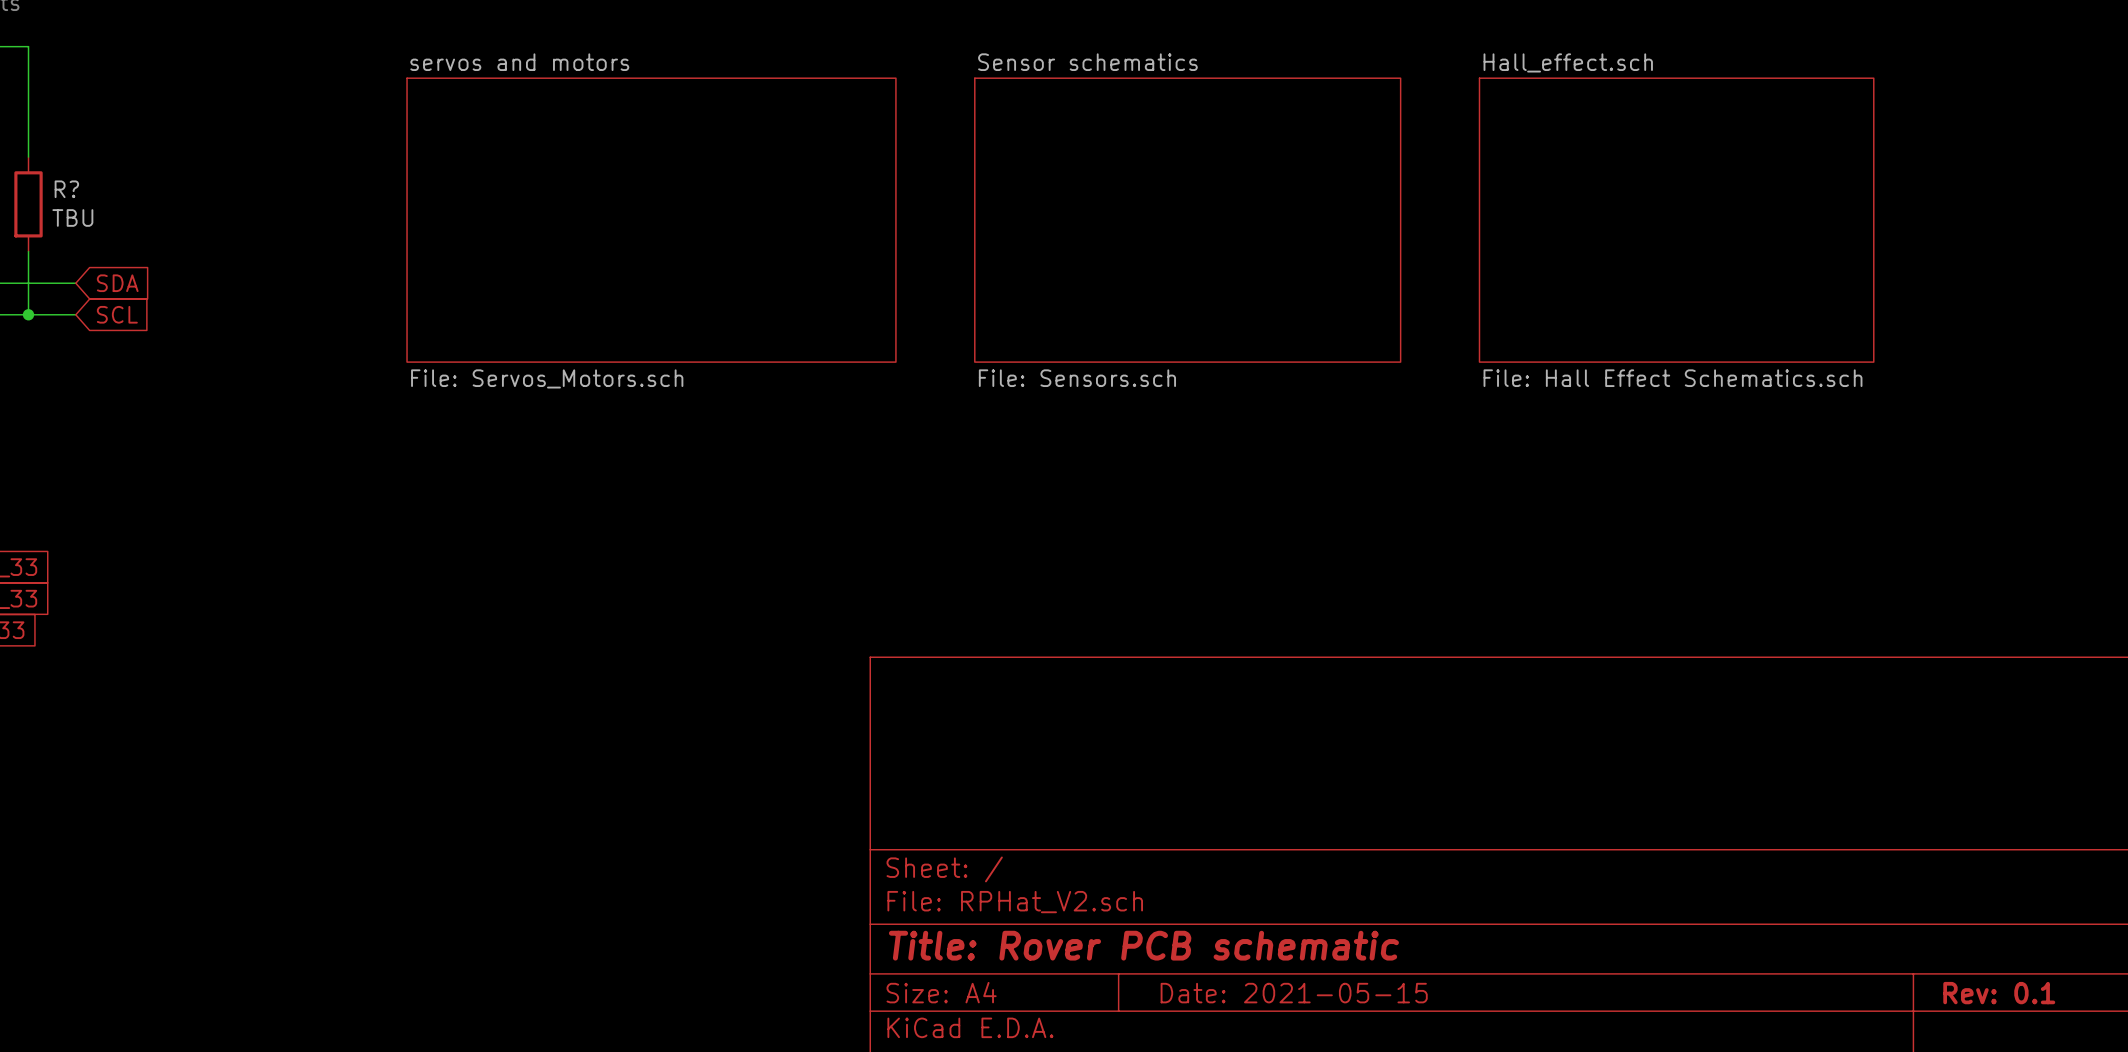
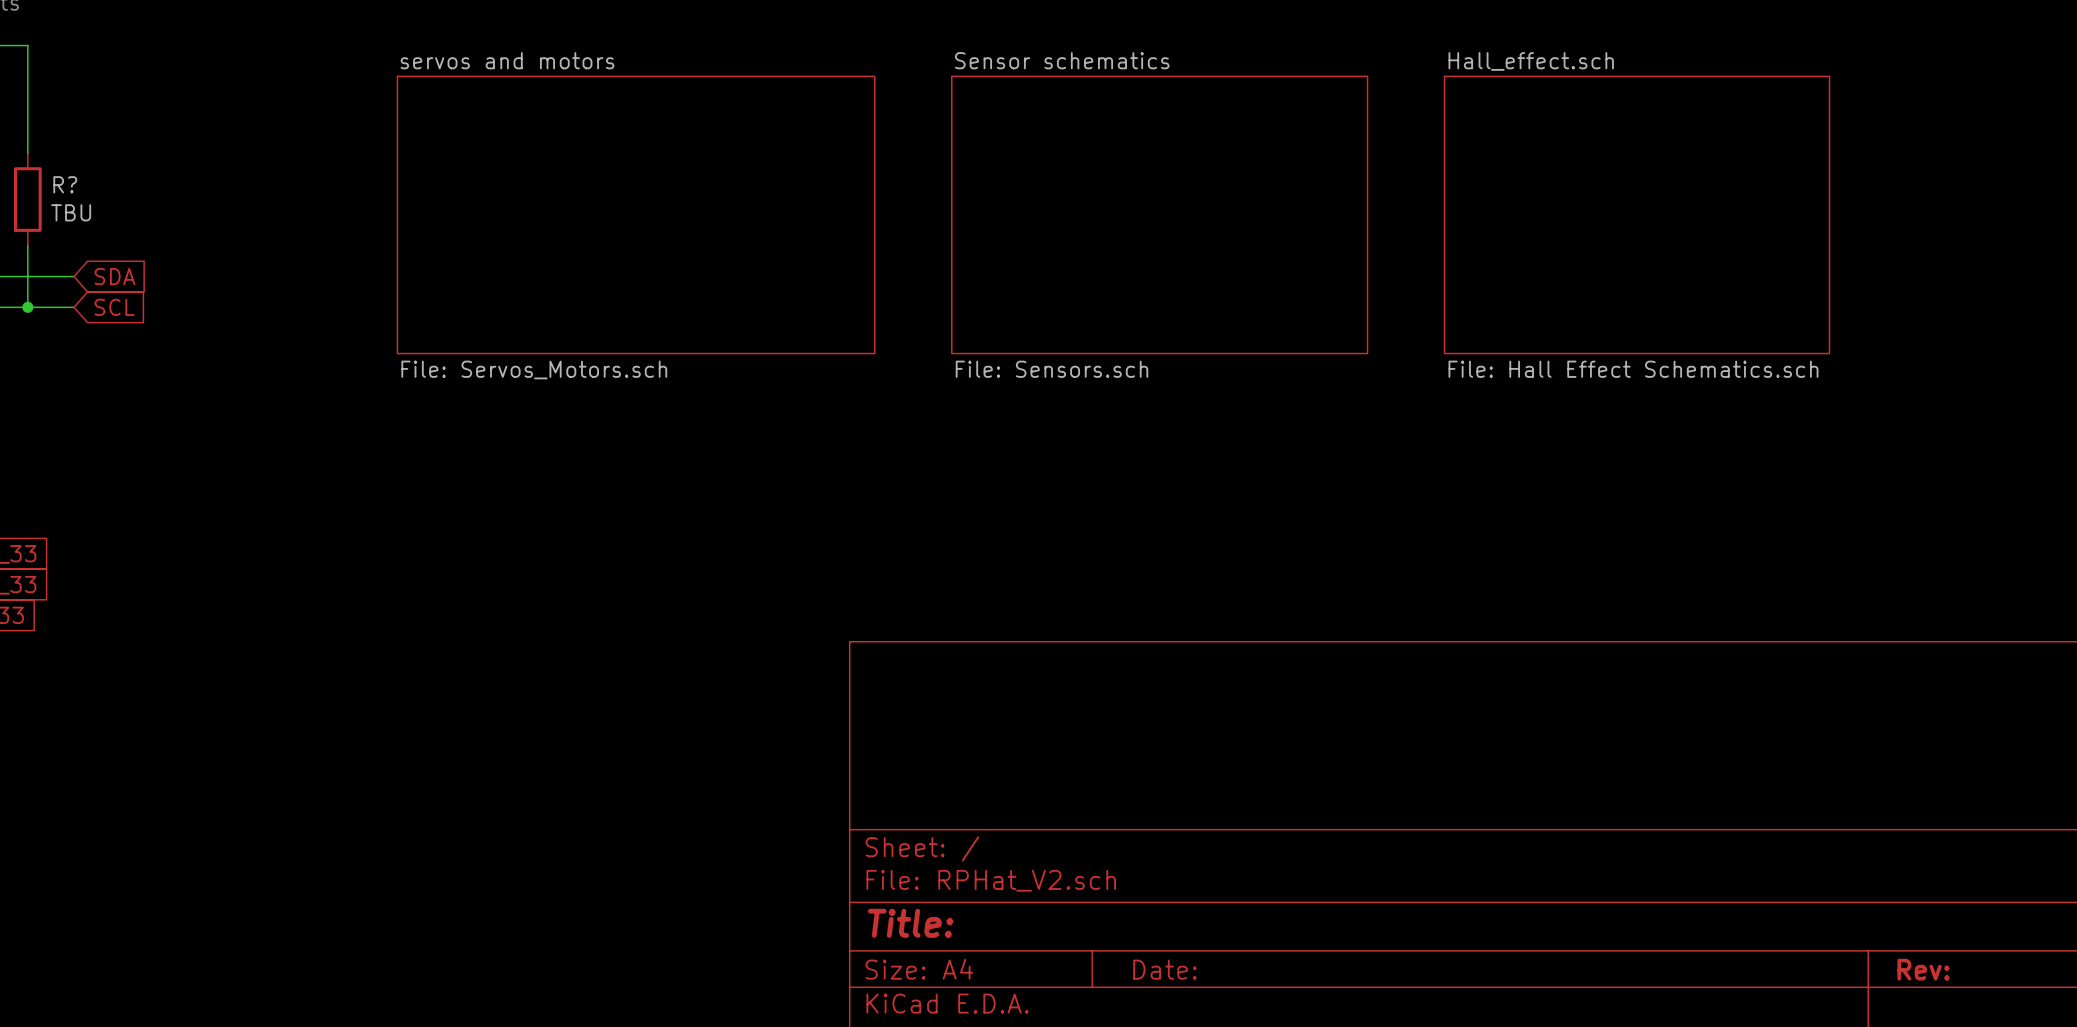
title block: Title: Rover PCB schematic (1143, 945) -> Title: (910, 923)
title block: Date: 2021-05-15 (1294, 993) -> Date: (1164, 969)
title block: Rev: 0.1 (1999, 993) -> Rev: (1923, 969)

